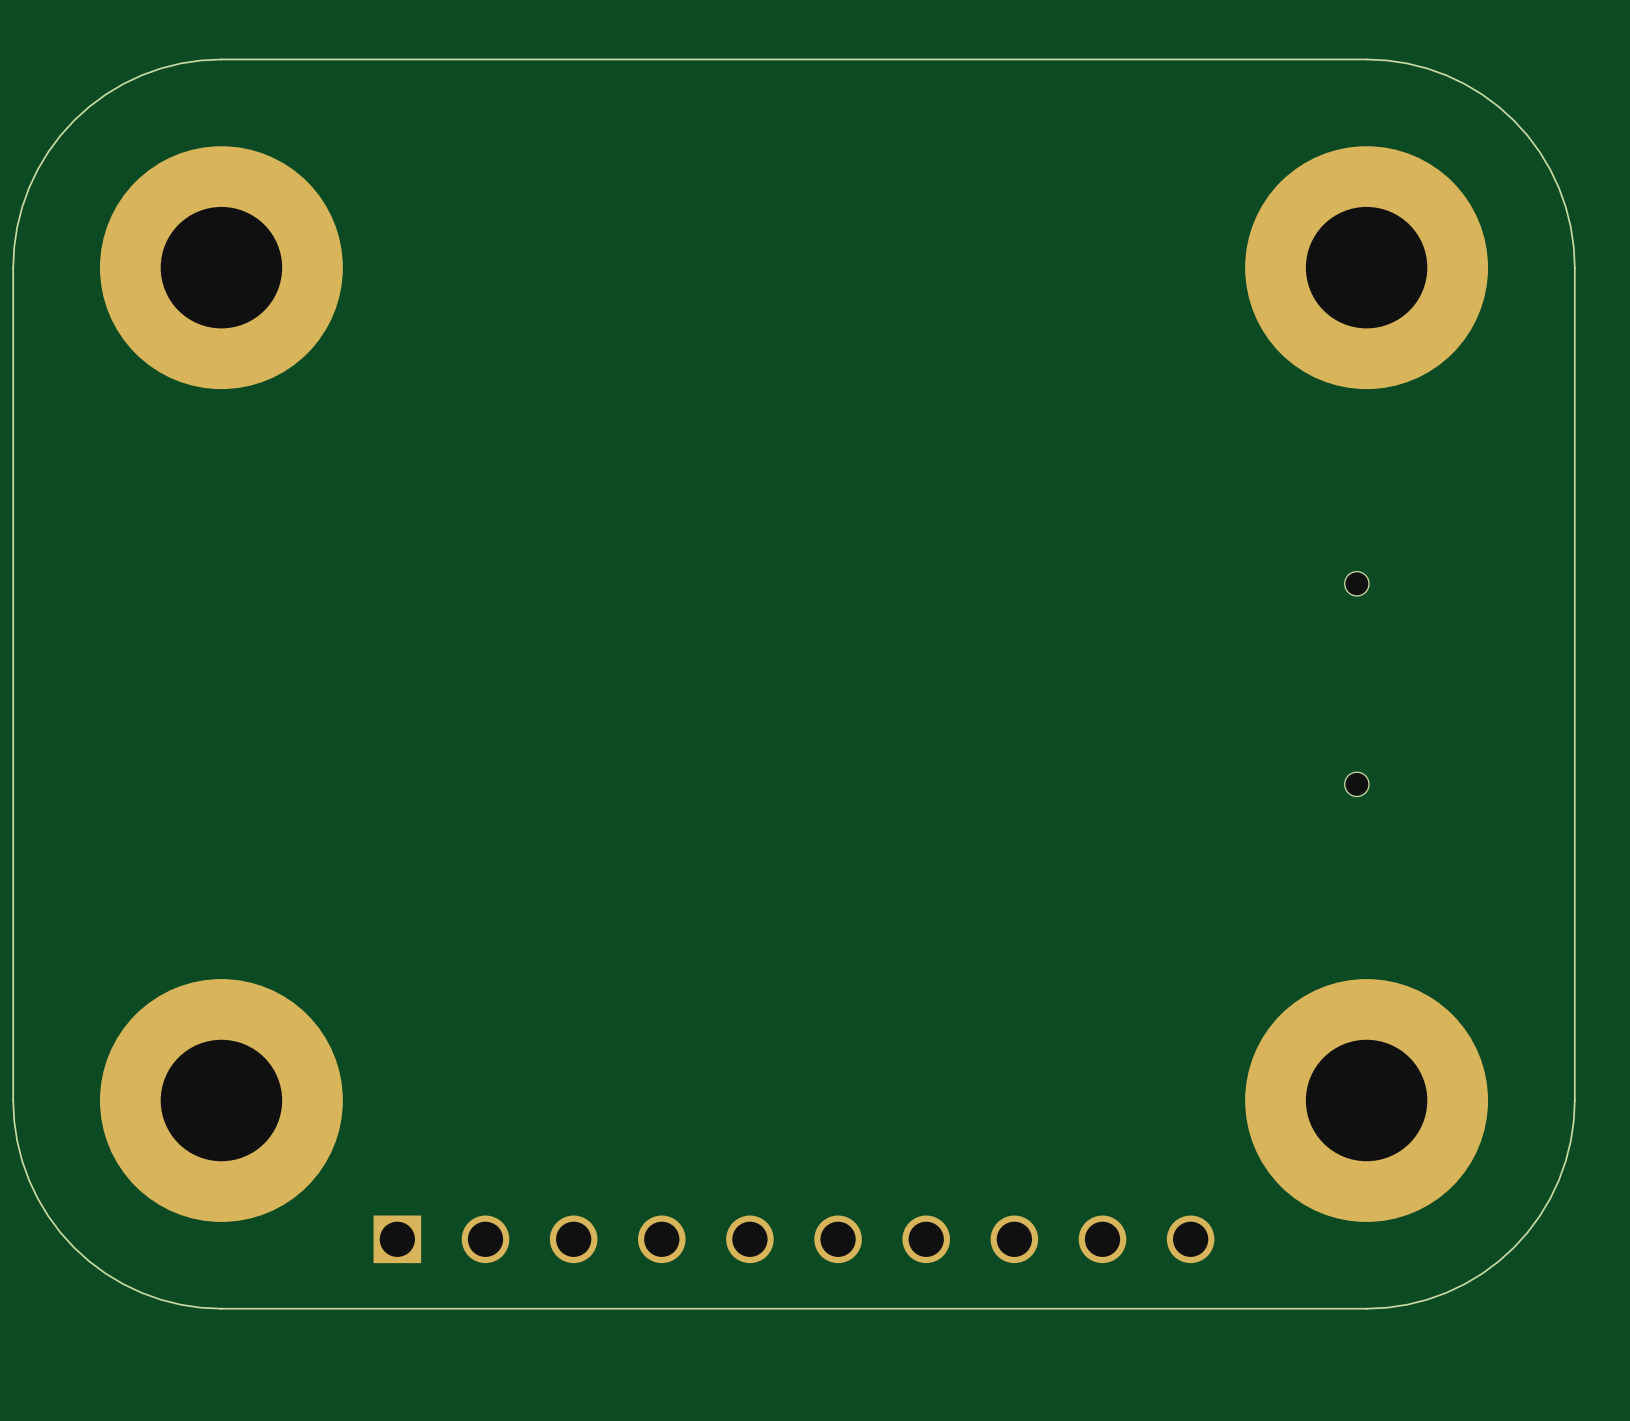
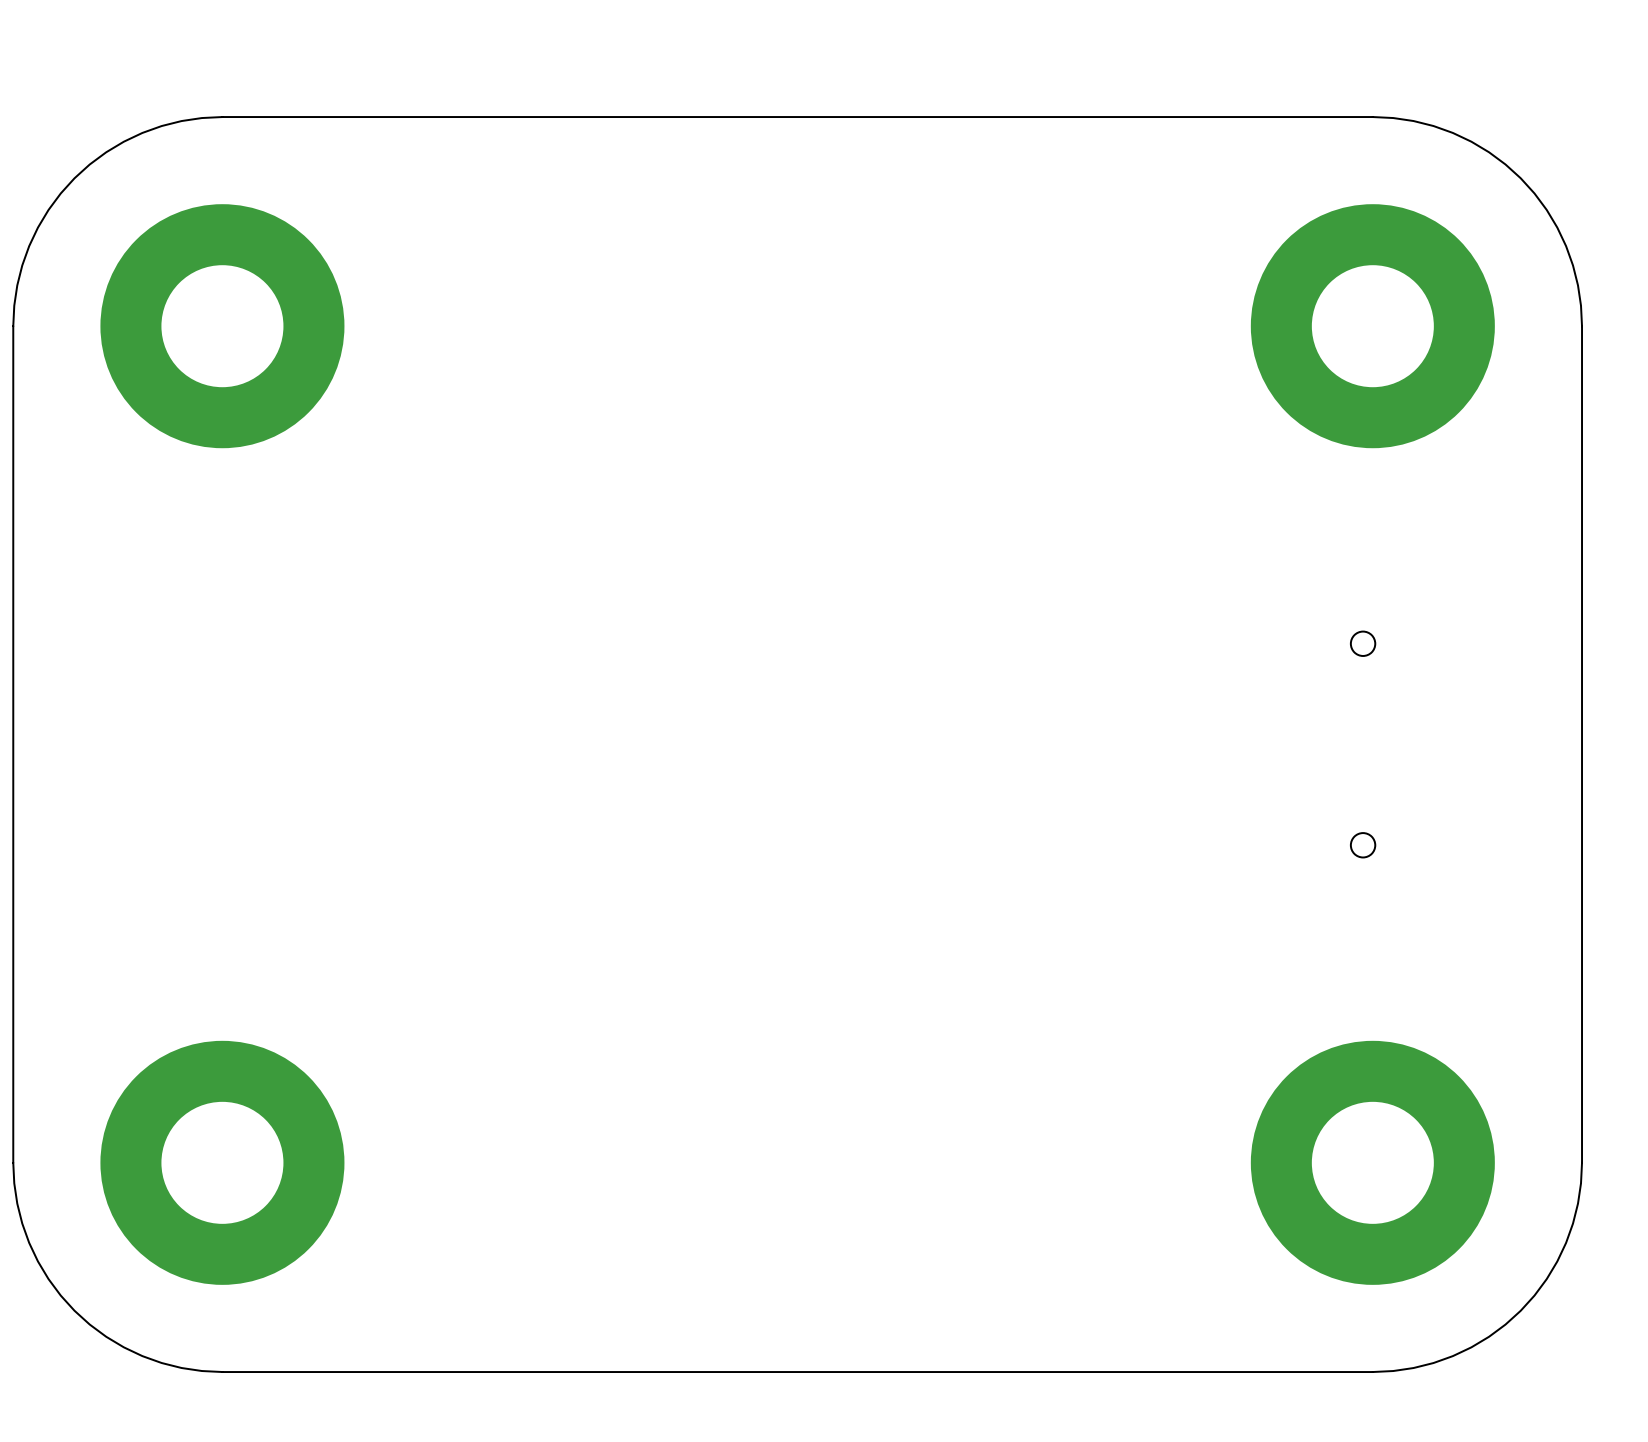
part: (794, 1239) -> none

